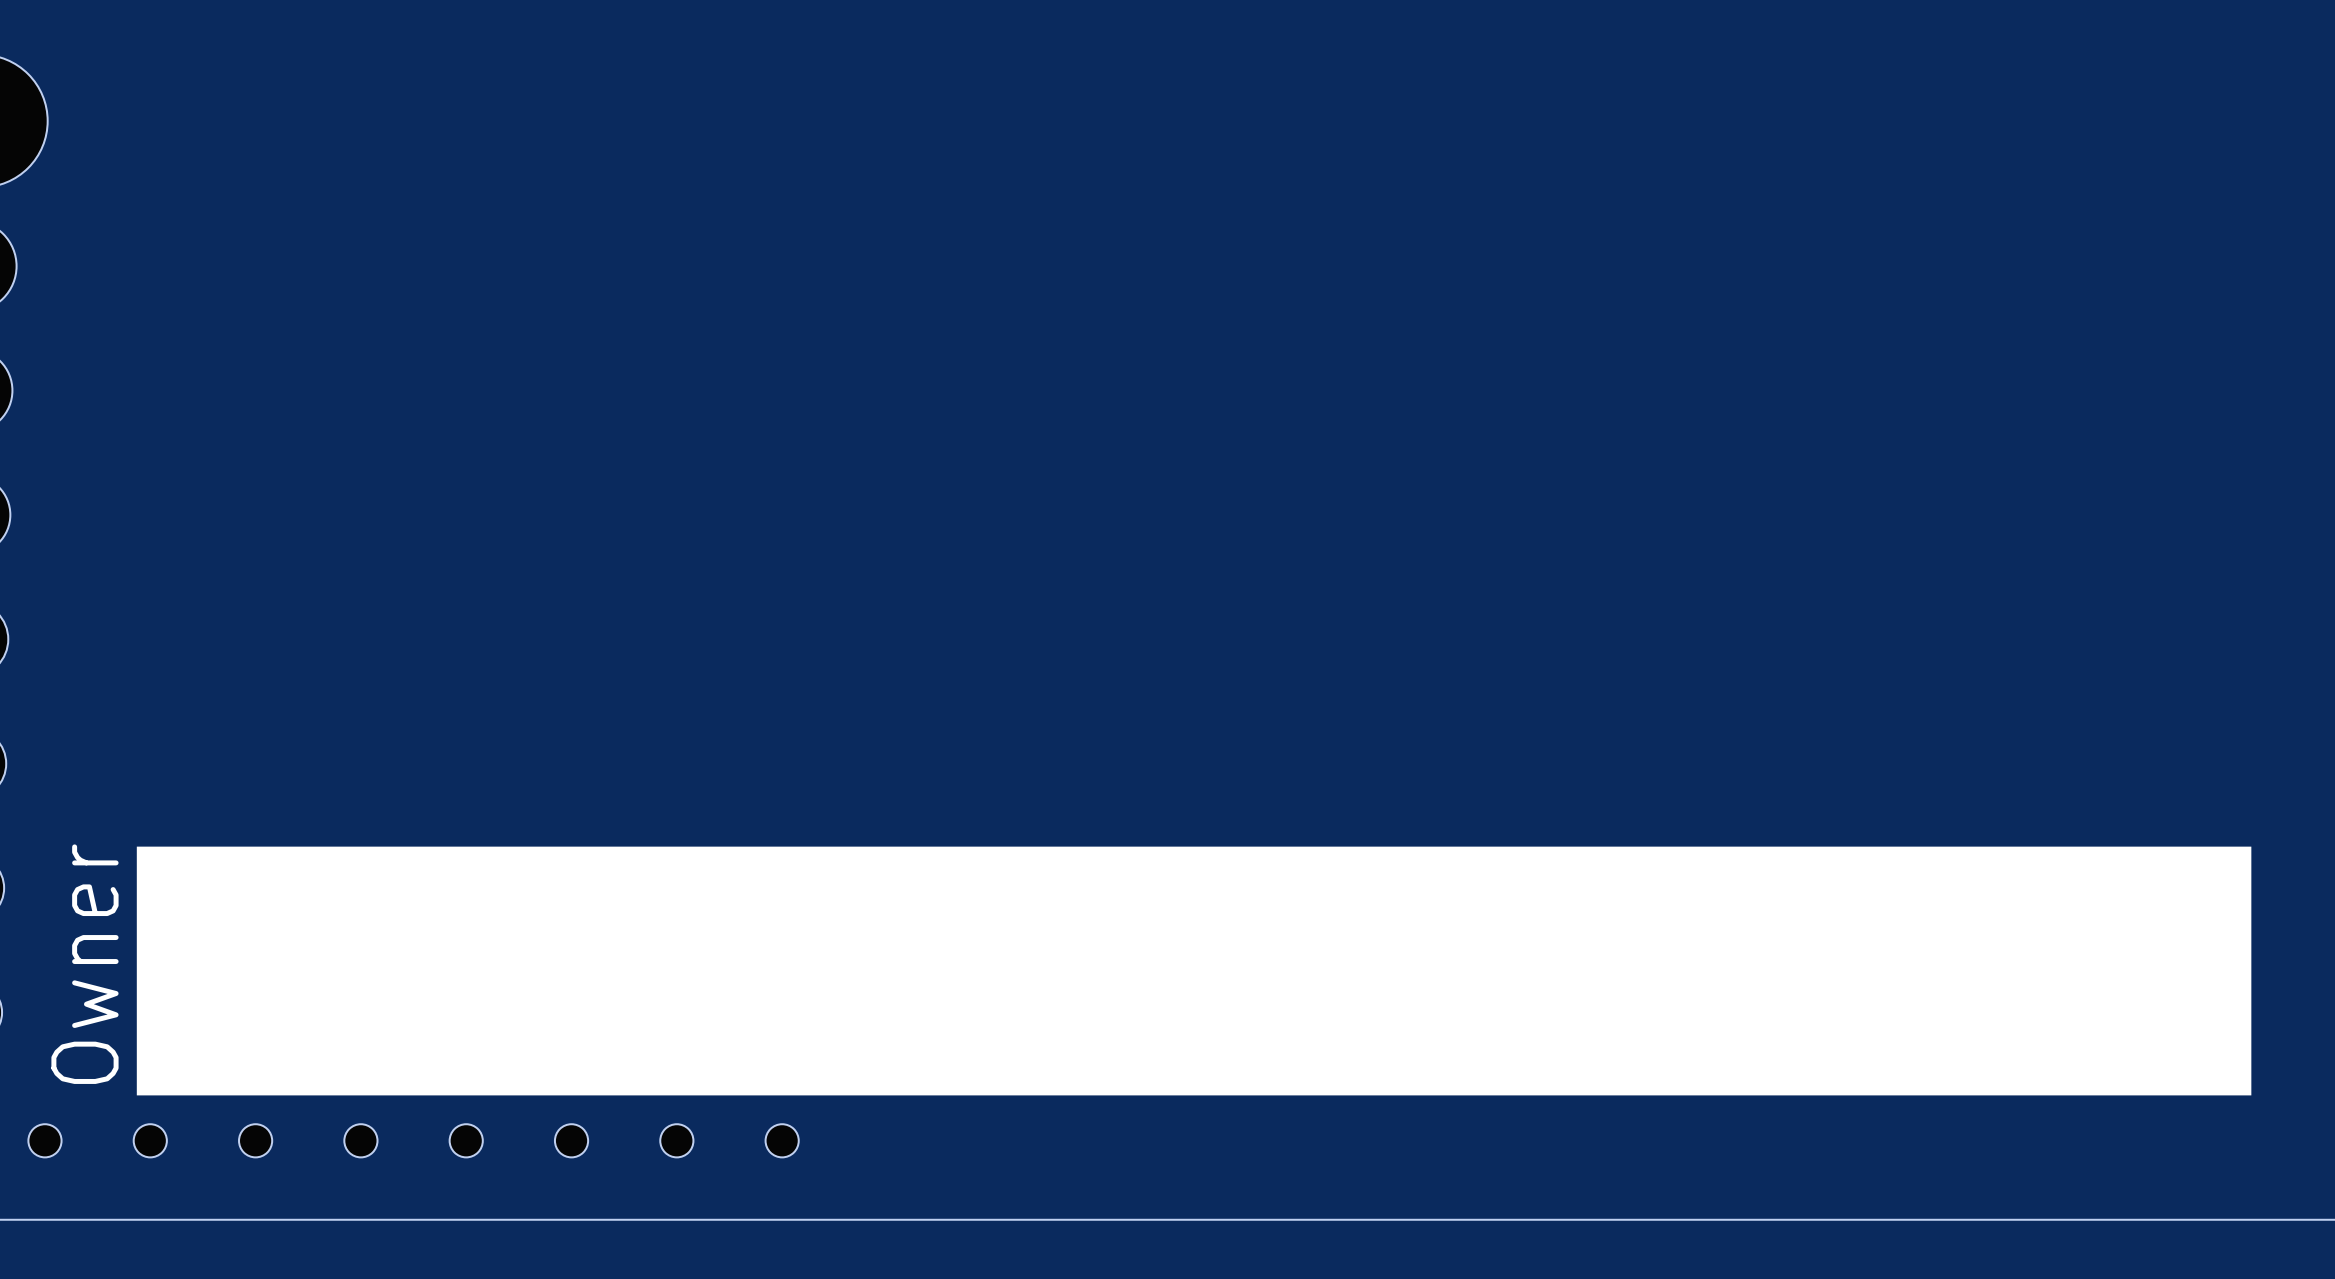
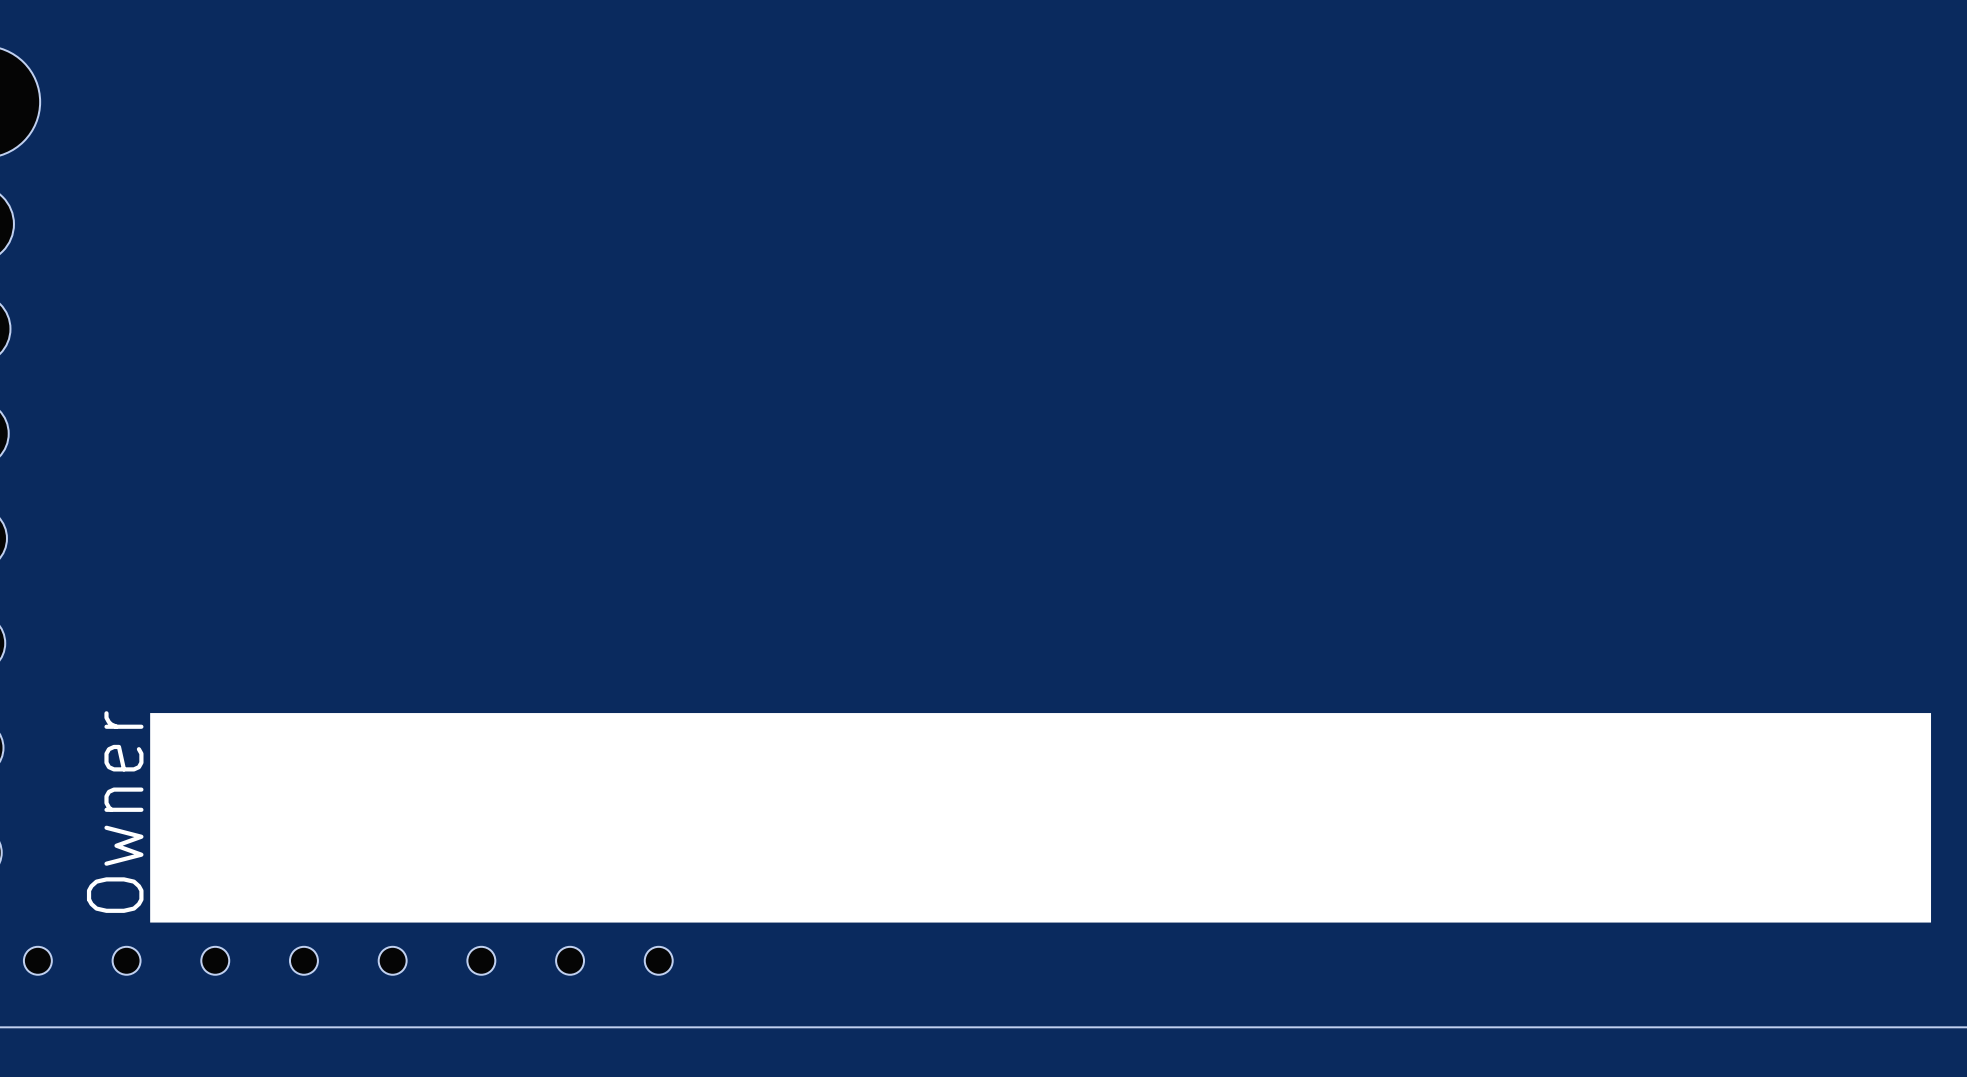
text position: Owner (84, 964) -> Owner (115, 812)
drawing position: (1194, 971) -> (1040, 817)

